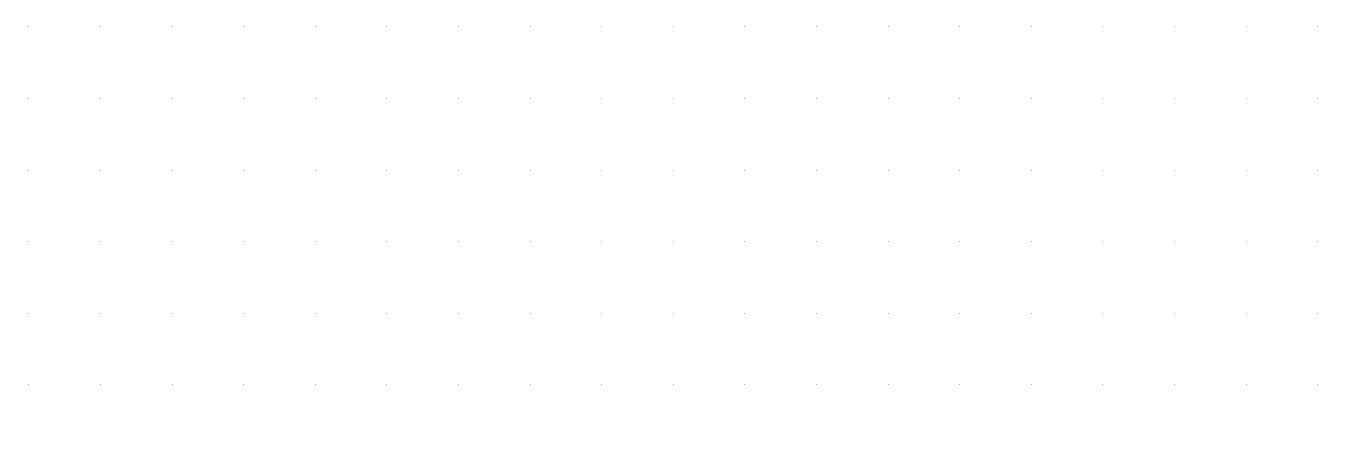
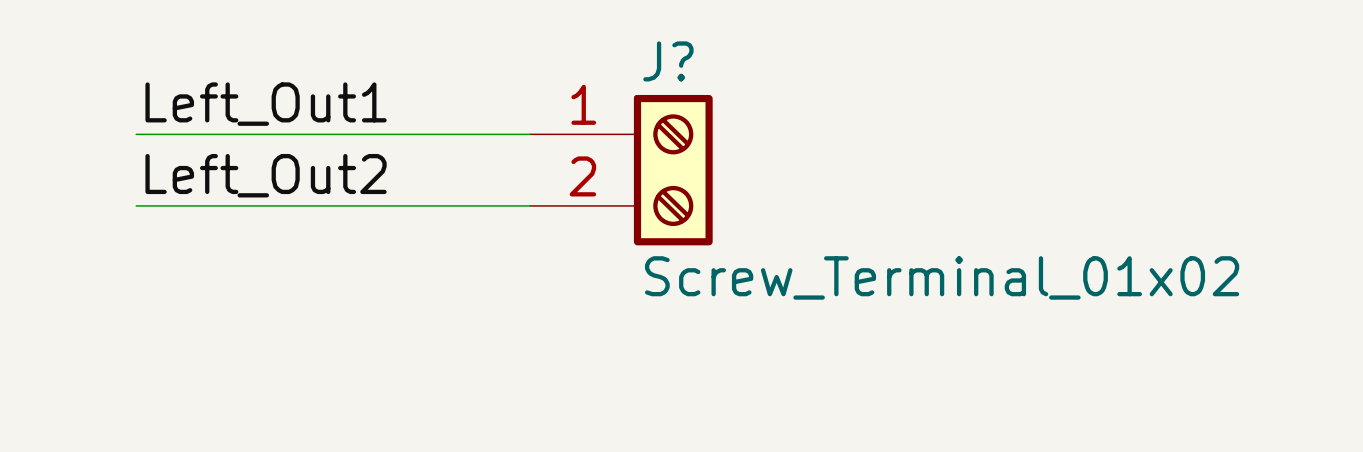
label: none -> Left_Out1 (266, 104)
wire: none -> (136, 134) (530, 134)
J?: none -> Screw_Terminal_01x02 (621, 170)
label: none -> Left_Out2 (266, 175)
wire: none -> (136, 205) (530, 205)

